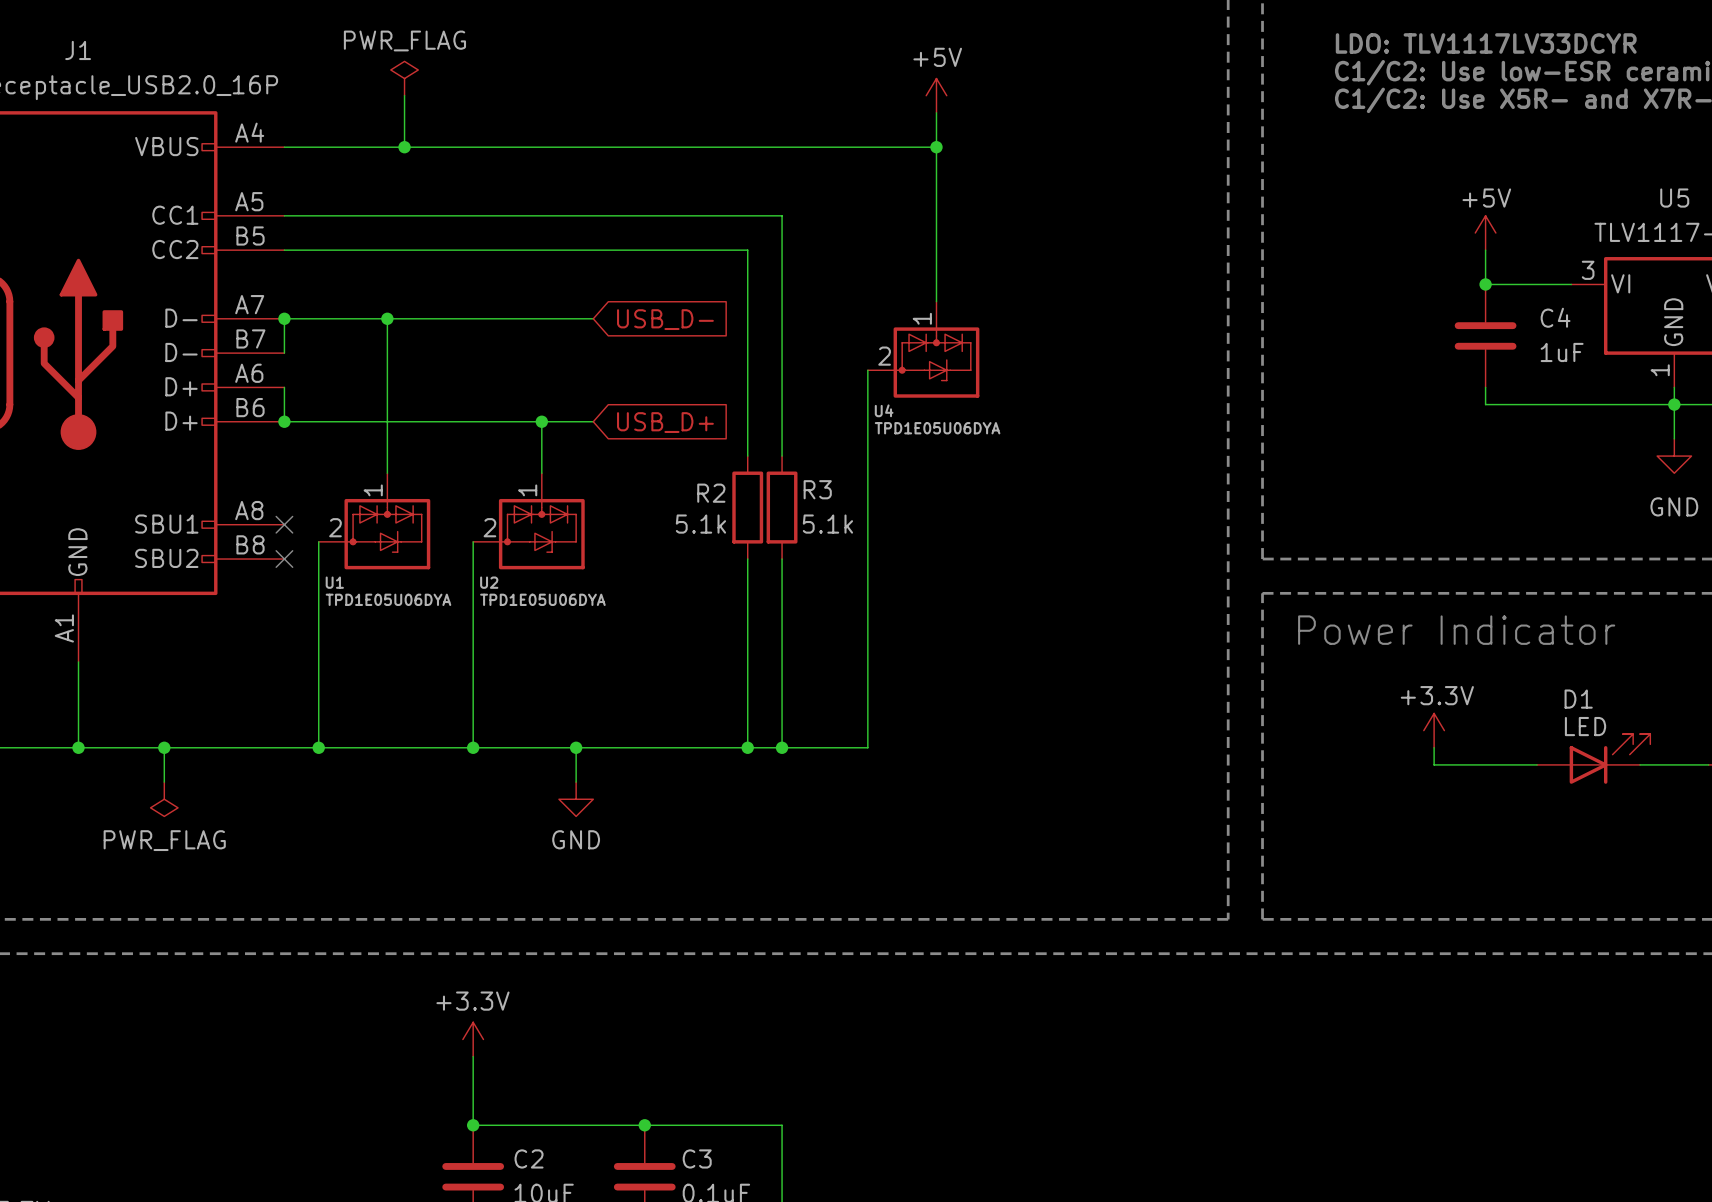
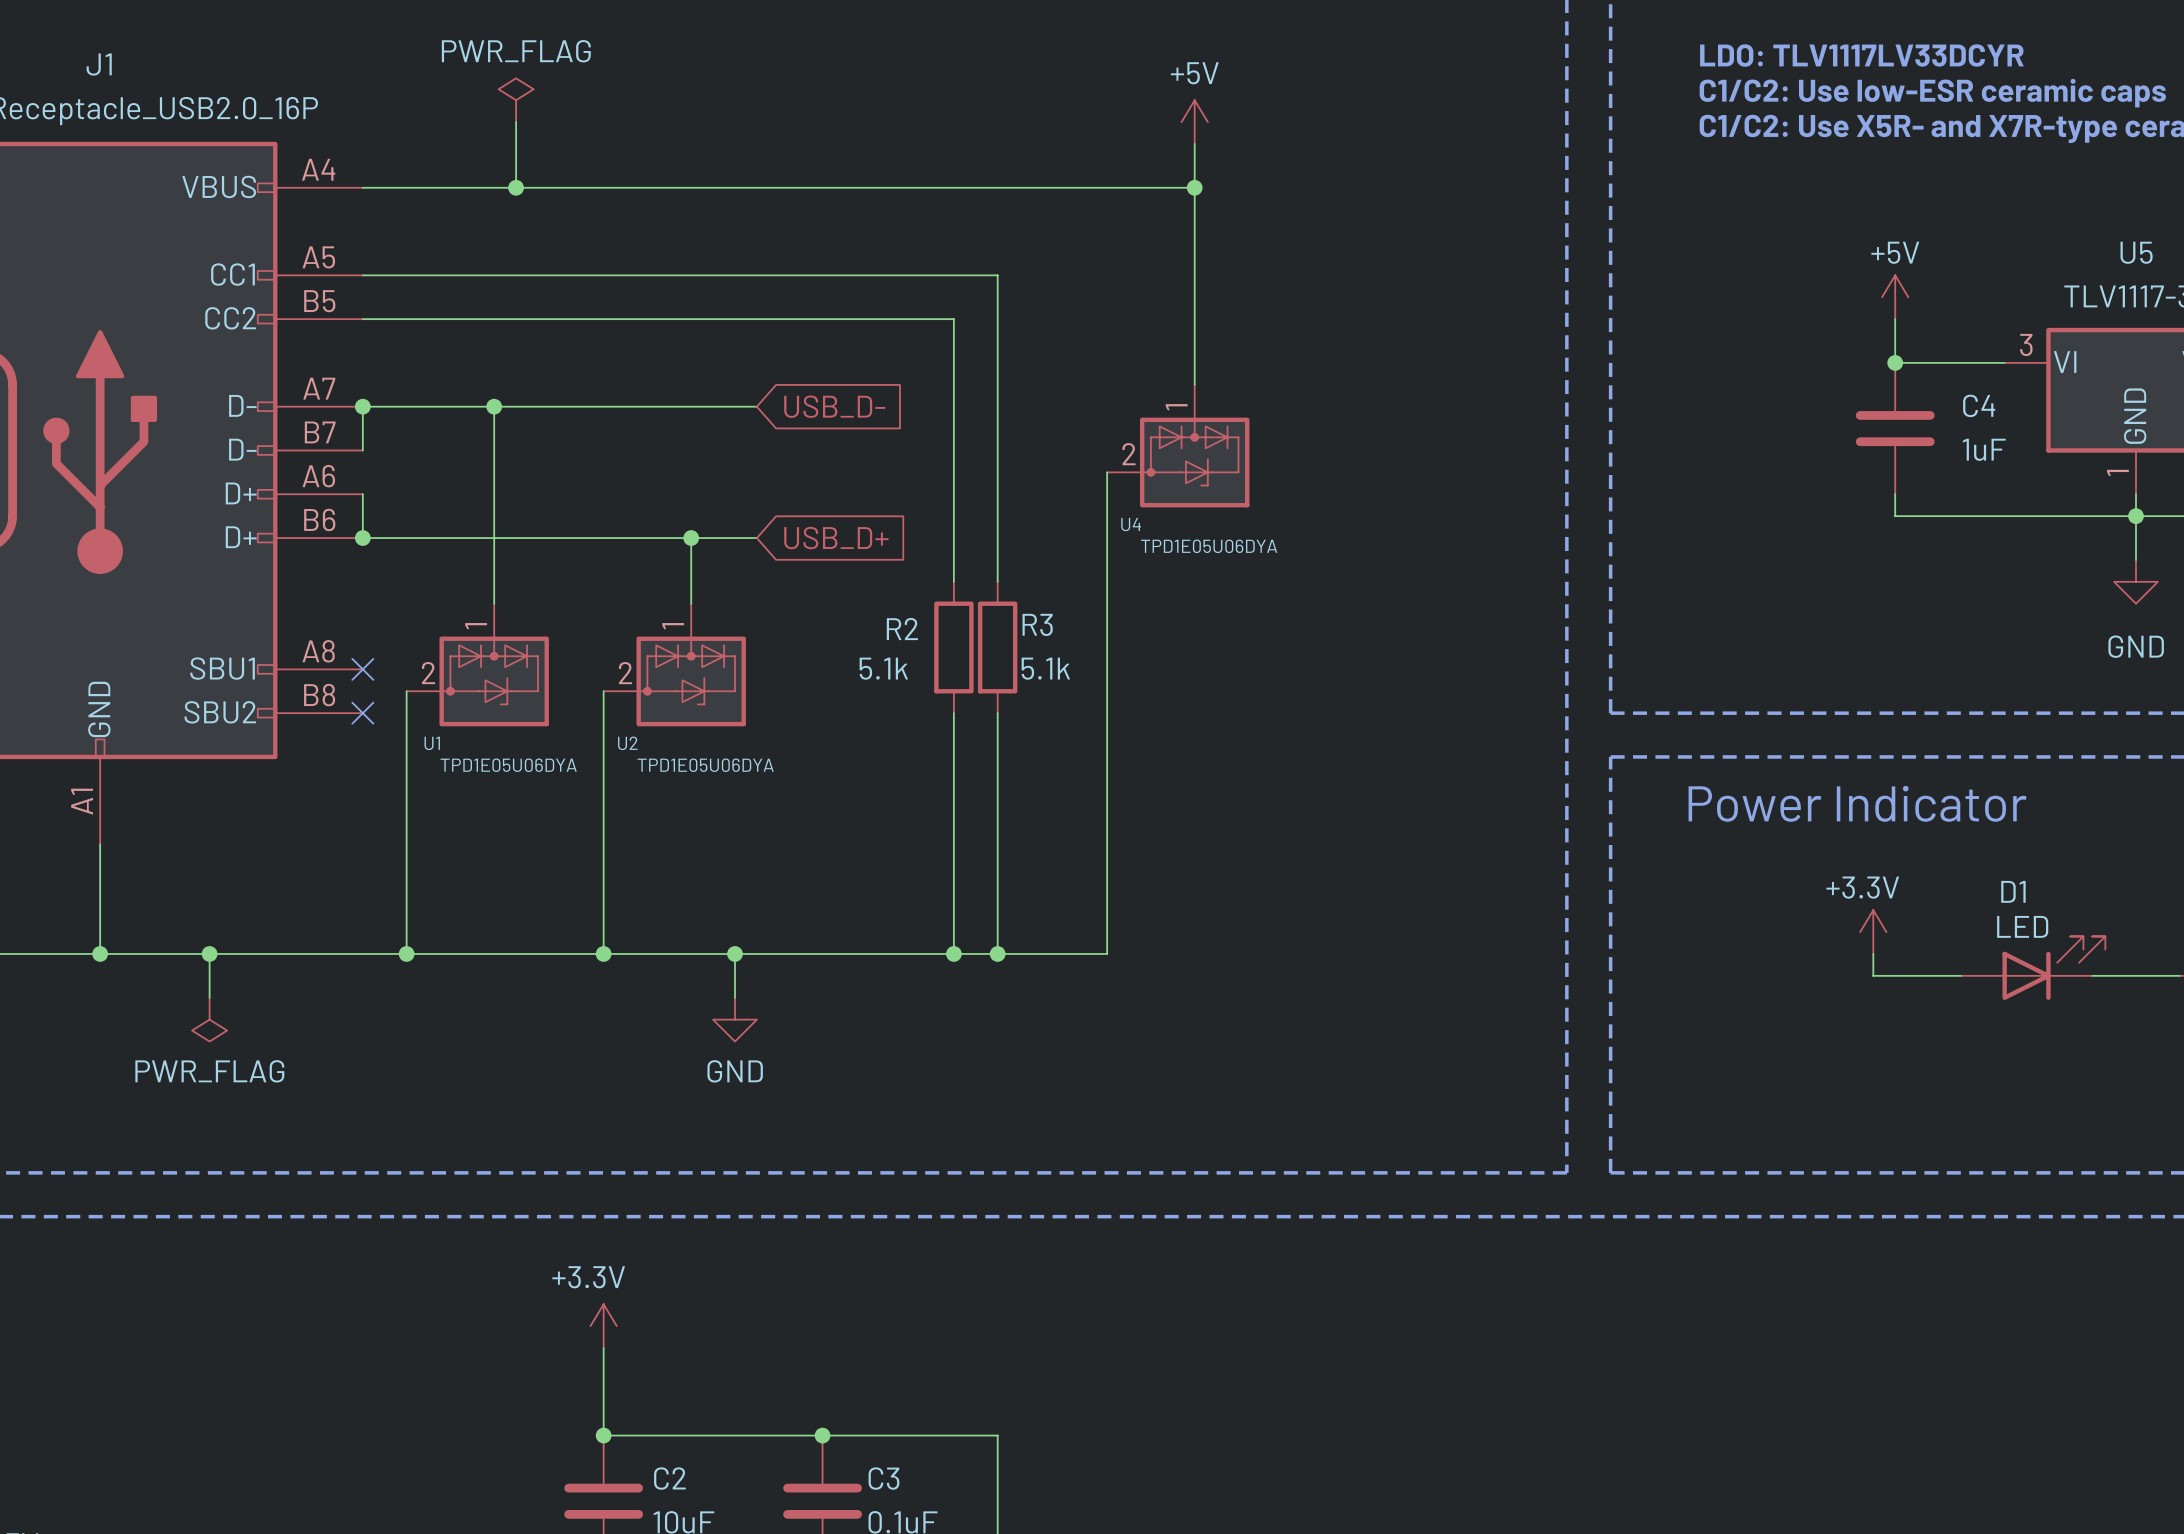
power symbol position: +3.3V (1434, 730) -> +3.3V (1873, 932)
wire: (1434, 747) (1434, 764) (1468, 764) -> (1873, 953) (1873, 975)

